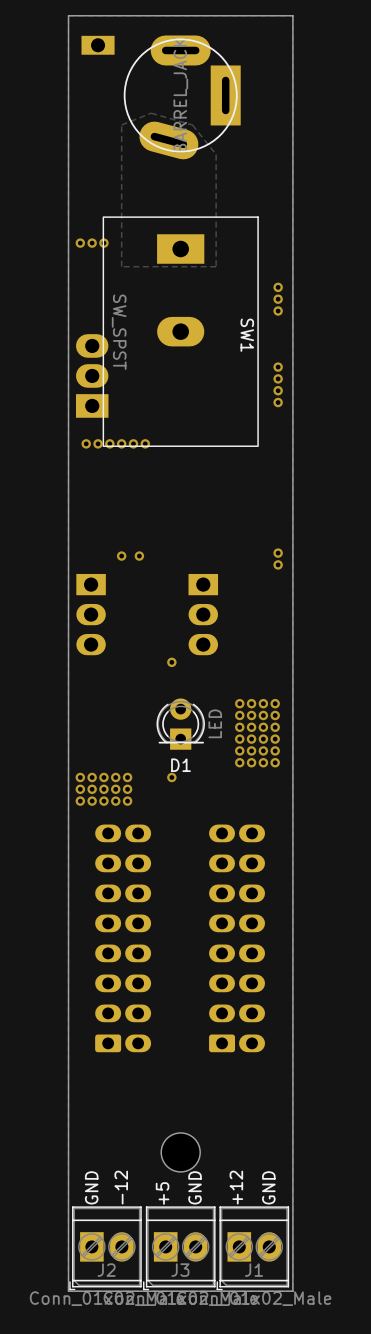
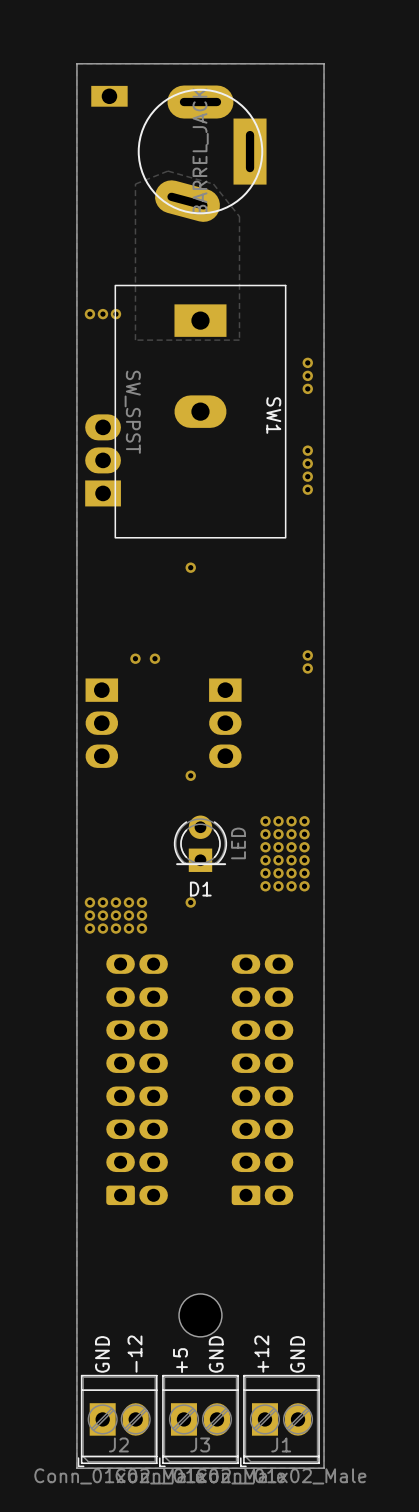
via: (86, 443) -> none
via: (98, 443) -> none
via: (109, 443) -> none
via: (121, 443) -> none
via: (133, 443) -> none
via: (145, 443) -> none
via: none -> (190, 567)

